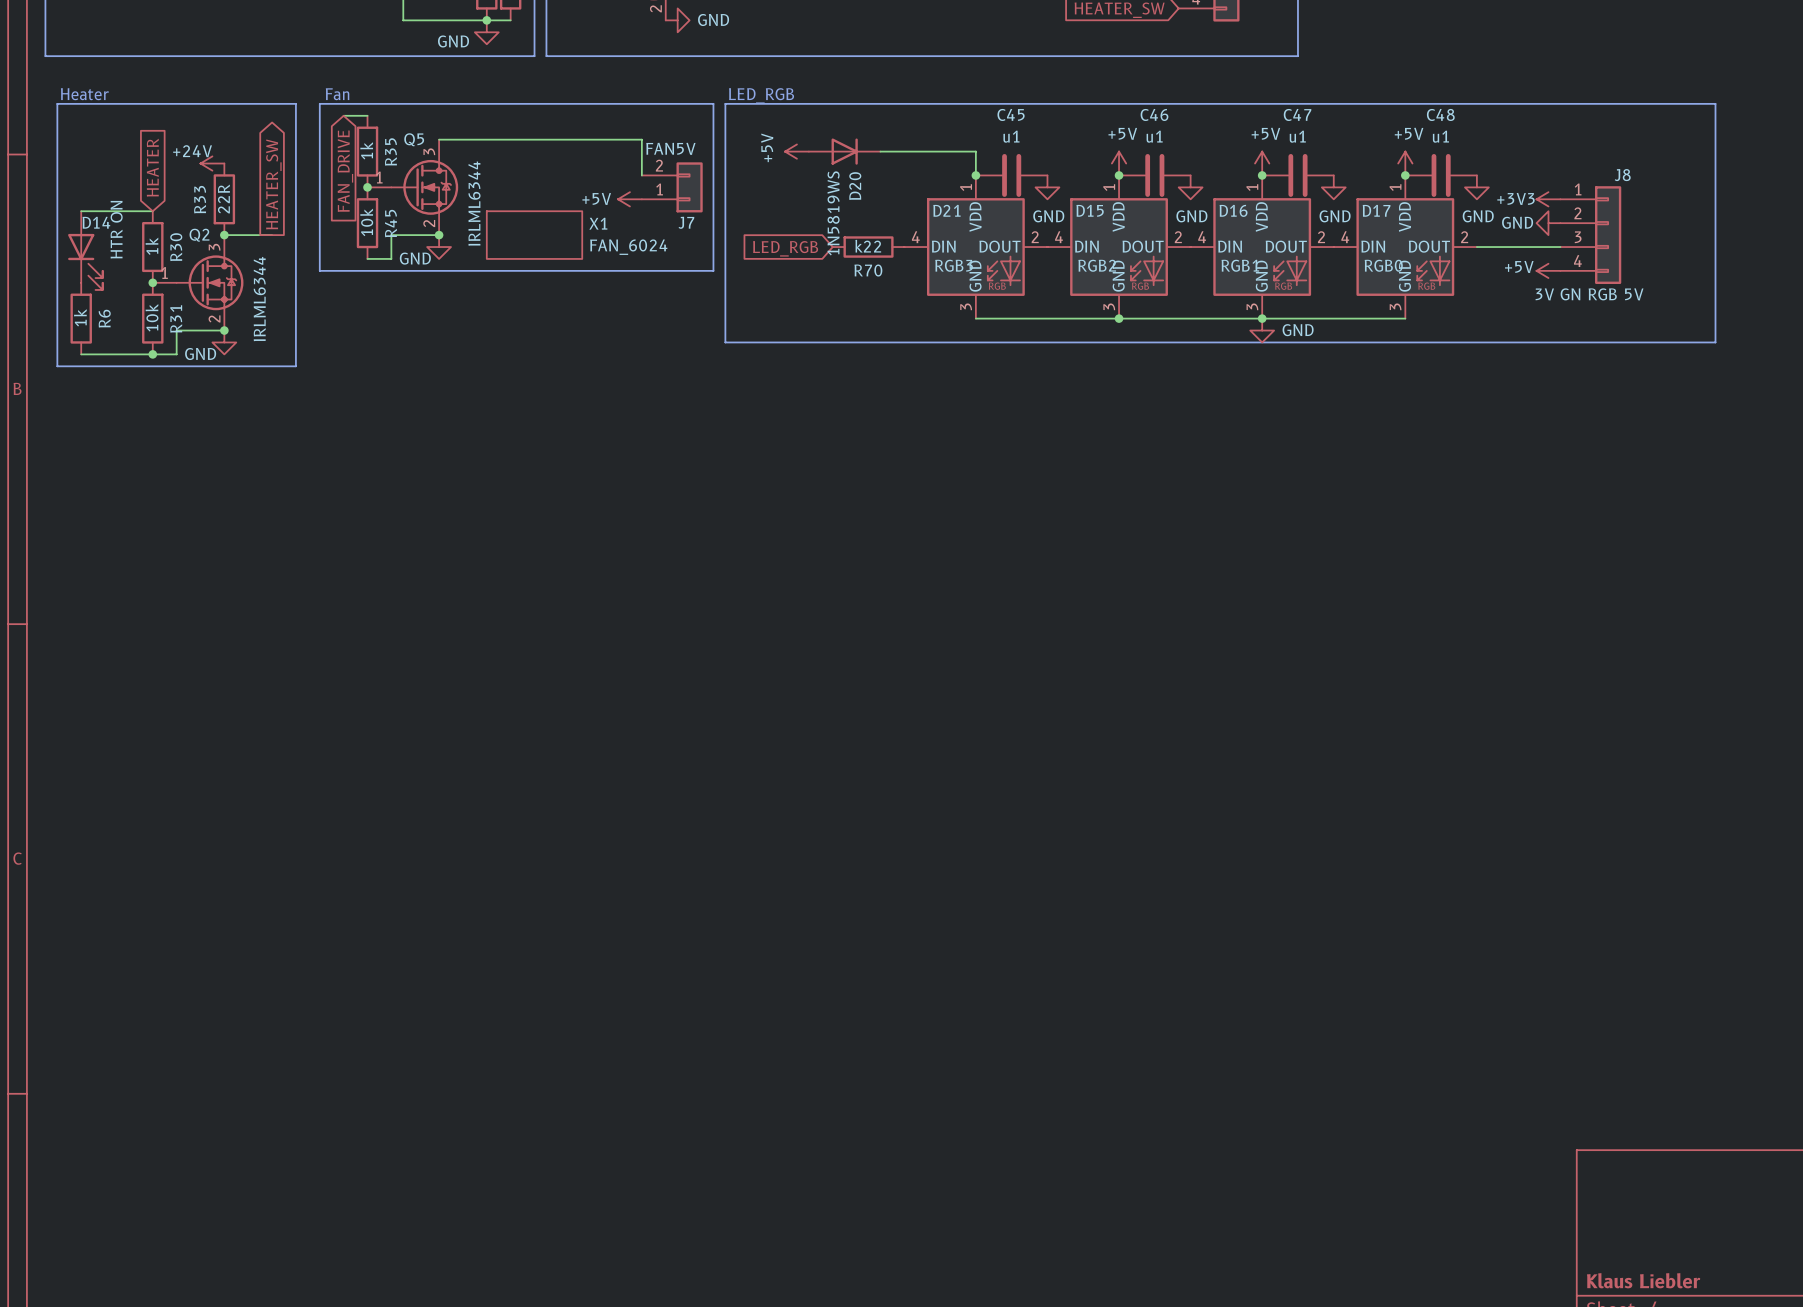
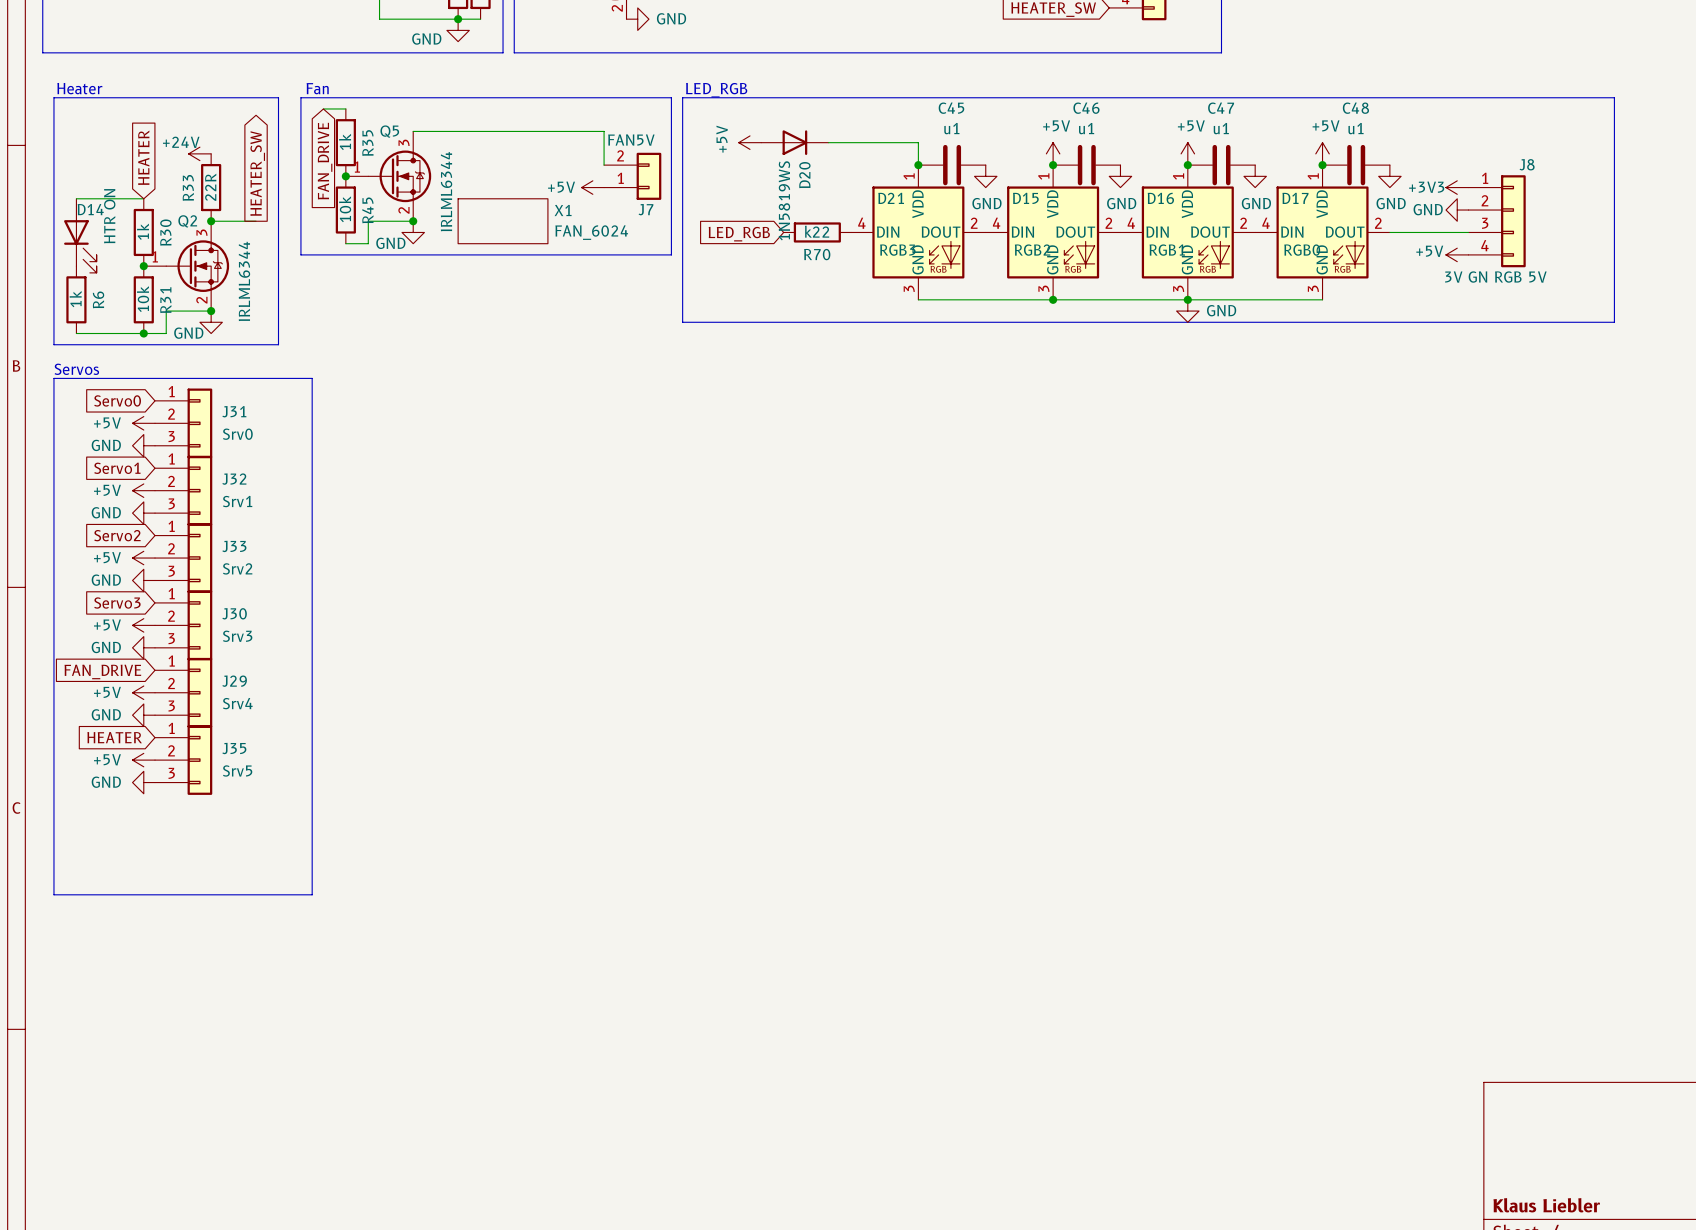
text: none -> Servos (76, 369)
line: none -> (53, 378) (312, 378) (312, 894) (53, 894) (53, 378)
global label: none -> Servo0 (117, 400)
power symbol: none -> +5V (143, 423)
J31: none -> Srv0 (183, 423)
power symbol: none -> GND (143, 445)
global label: none -> Servo1 (117, 468)
power symbol: none -> +5V (143, 490)
J32: none -> Srv1 (183, 490)
power symbol: none -> GND (143, 513)
global label: none -> Servo2 (117, 535)
power symbol: none -> +5V (143, 558)
J33: none -> Srv2 (183, 558)
power symbol: none -> GND (143, 580)
global label: none -> Servo3 (117, 603)
power symbol: none -> +5V (143, 625)
J30: none -> Srv3 (183, 625)
power symbol: none -> GND (143, 647)
global label: none -> FAN_DRIVE (102, 671)
power symbol: none -> +5V (143, 692)
J29: none -> Srv4 (183, 692)
power symbol: none -> GND (143, 715)
global label: none -> HEATER (114, 737)
power symbol: none -> +5V (143, 760)
J35: none -> Srv5 (183, 760)
power symbol: none -> GND (143, 782)

